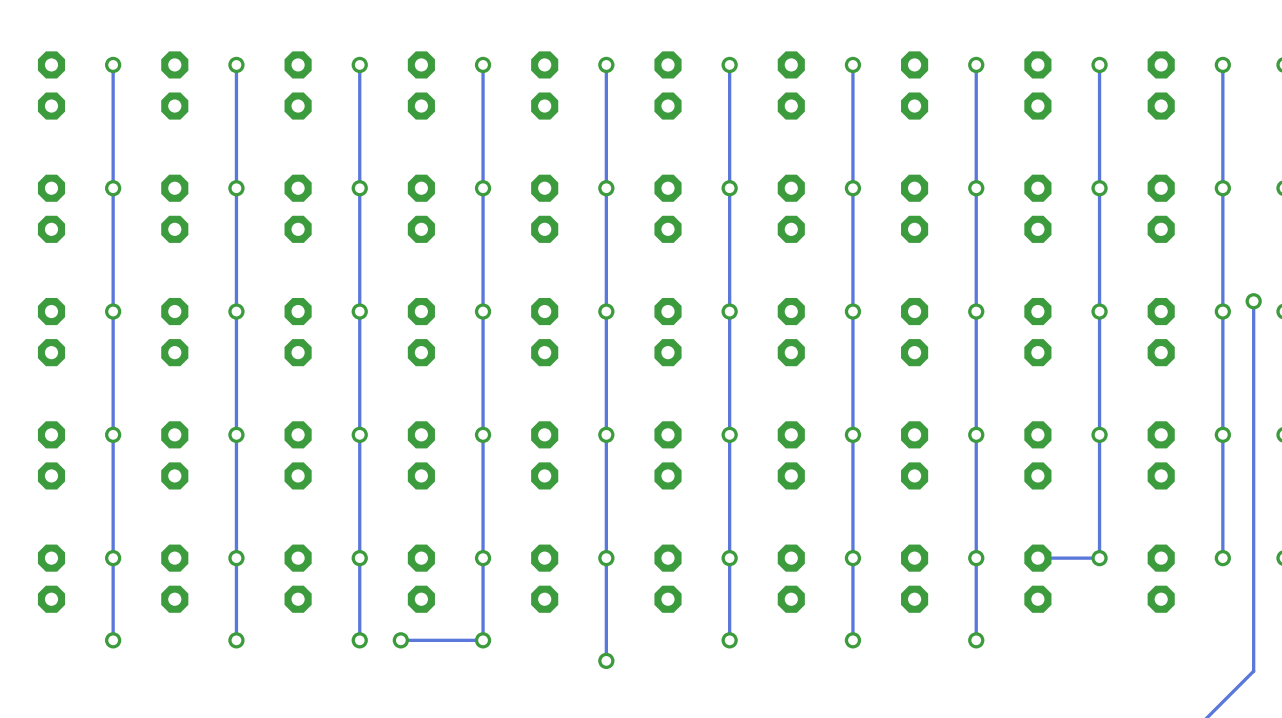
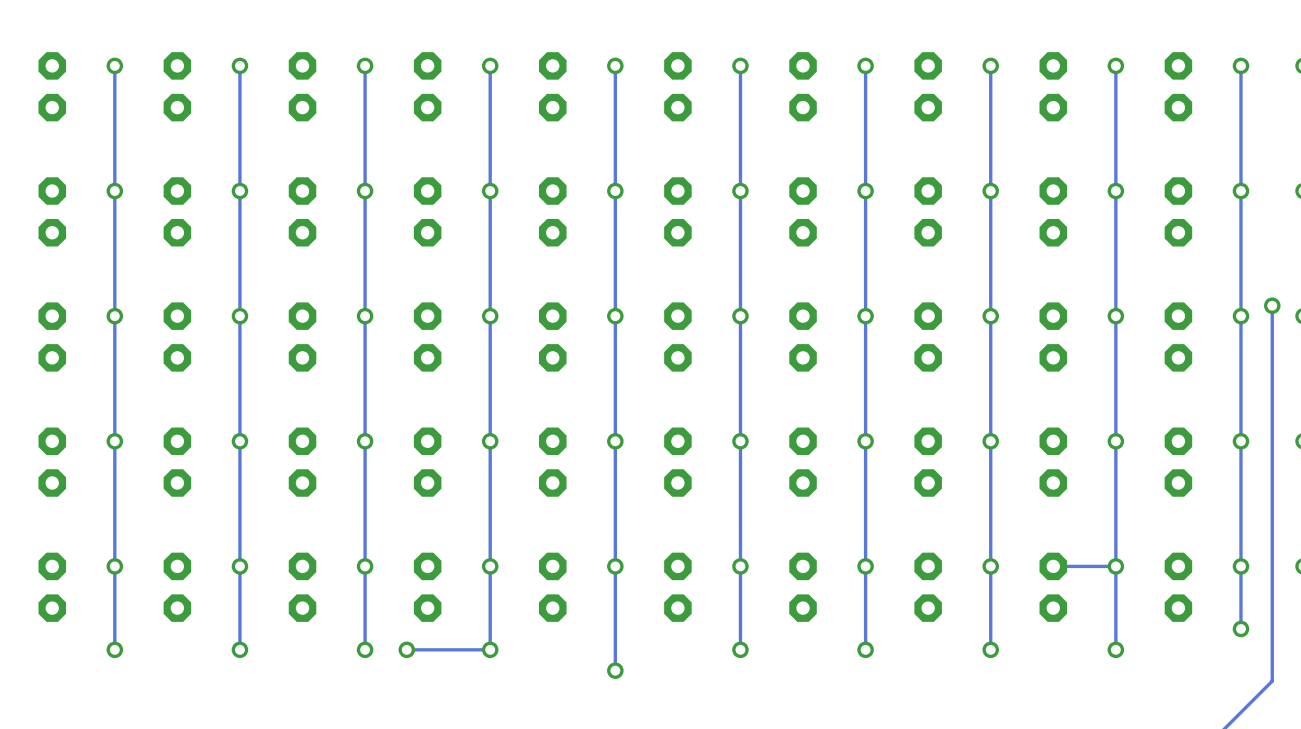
track: none -> (1115, 566) (1115, 649)
track: none -> (1240, 566) (1240, 628)
via: none -> (1240, 628)
via: none -> (1115, 649)

